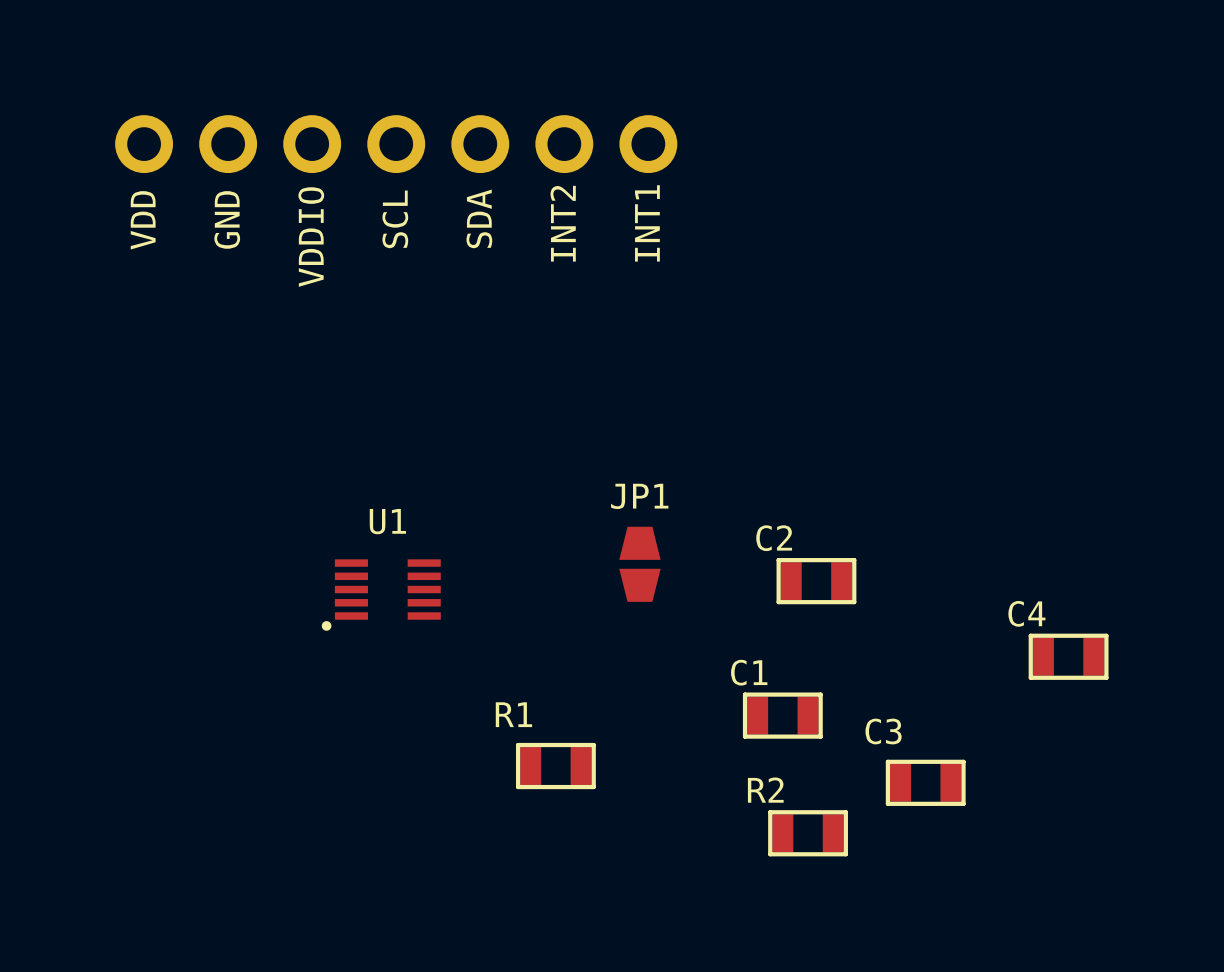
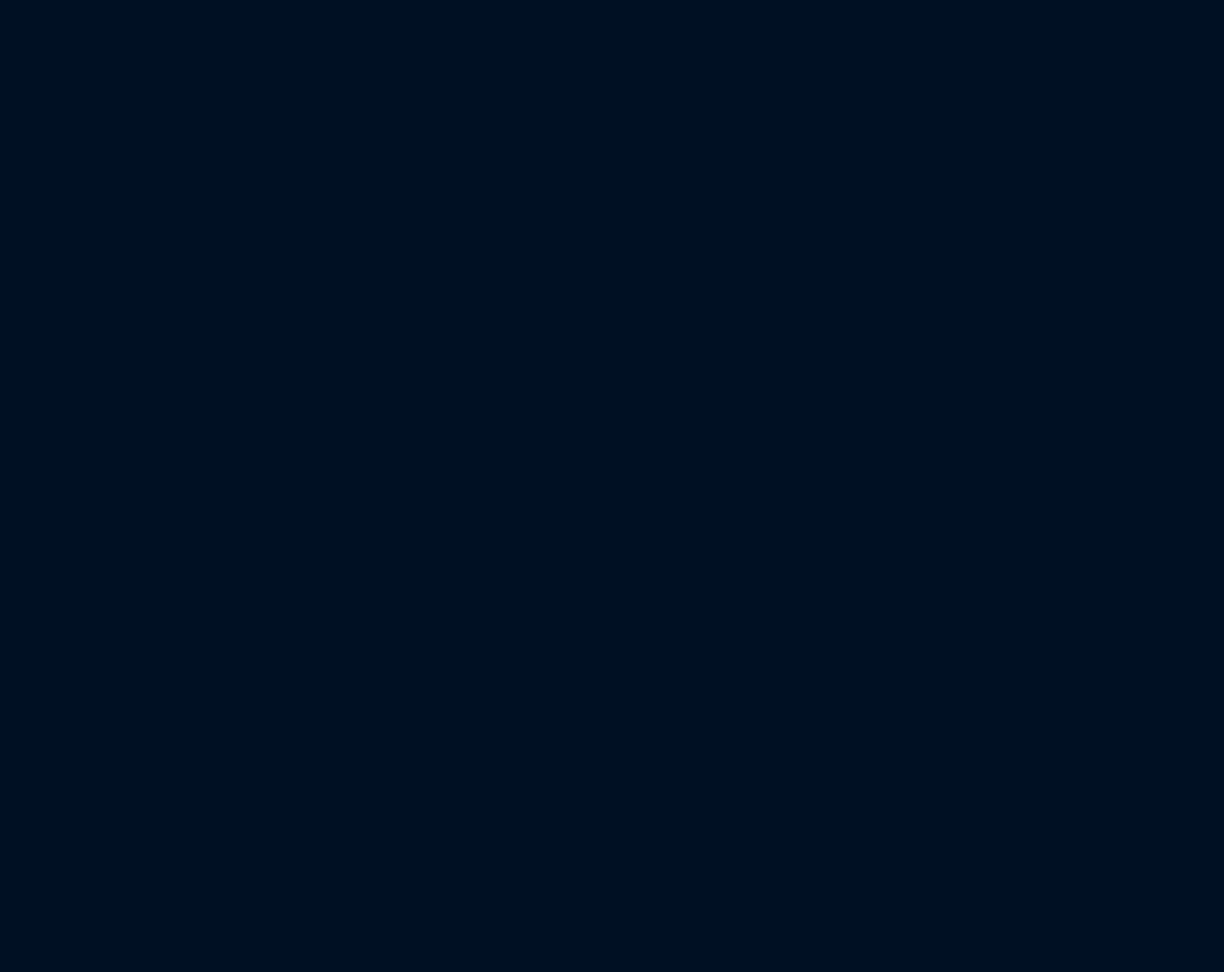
part: VDD (144, 144) -> none
part: GND (228, 144) -> none
part: VDDIO (312, 144) -> none
part: SCL (396, 144) -> none
part: SDA (480, 144) -> none
part: INT2 (564, 144) -> none
part: INT1 (648, 144) -> none
JP1: (639, 564) -> none
C2: (816, 581) -> none
U1: (381, 595) -> none
C4: (1068, 656) -> none
C1: (782, 715) -> none
R1: (555, 766) -> none
C3: (925, 782) -> none
R2: (808, 833) -> none

